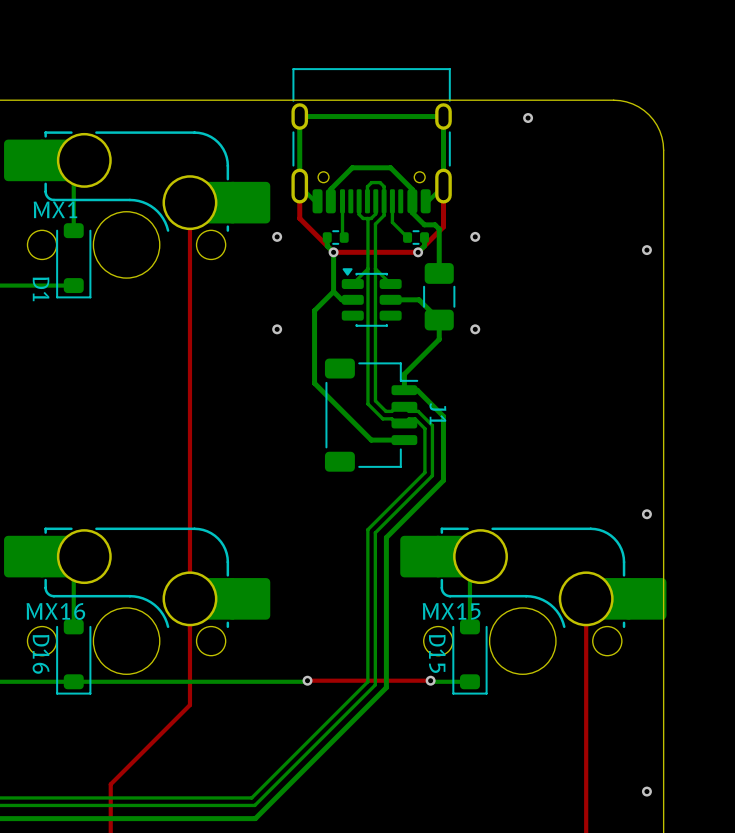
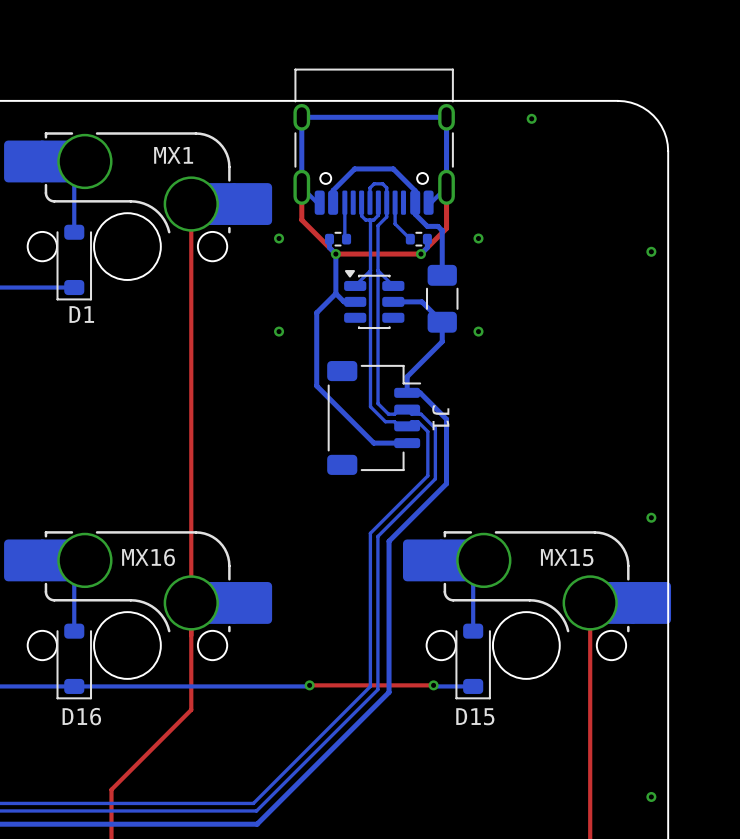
MX1 name position: MX1 (55, 209) -> MX1 (173, 155)
D1 name rotation: 0° (41, 289) -> 90° counterclockwise (81, 314)
D1 name position: D1 (41, 289) -> D1 (81, 314)
MX16 name position: MX16 (55, 611) -> MX16 (148, 557)
MX15 name position: MX15 (451, 611) -> MX15 (567, 557)
D15 name rotation: 0° (437, 653) -> 90° counterclockwise (475, 716)
D15 name position: D15 (437, 653) -> D15 (475, 716)
D16 name rotation: 0° (41, 654) -> 90° counterclockwise (81, 716)
D16 name position: D16 (41, 654) -> D16 (81, 716)

